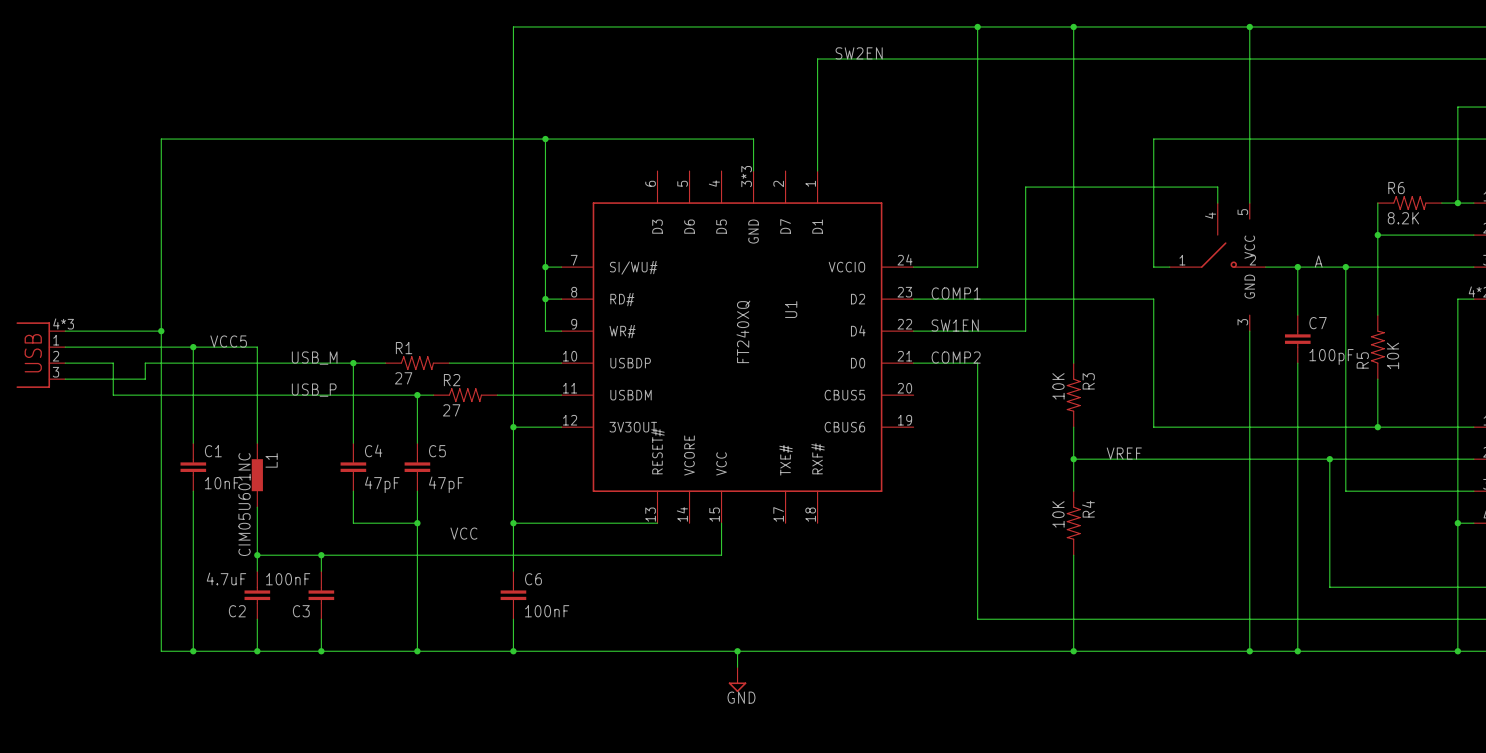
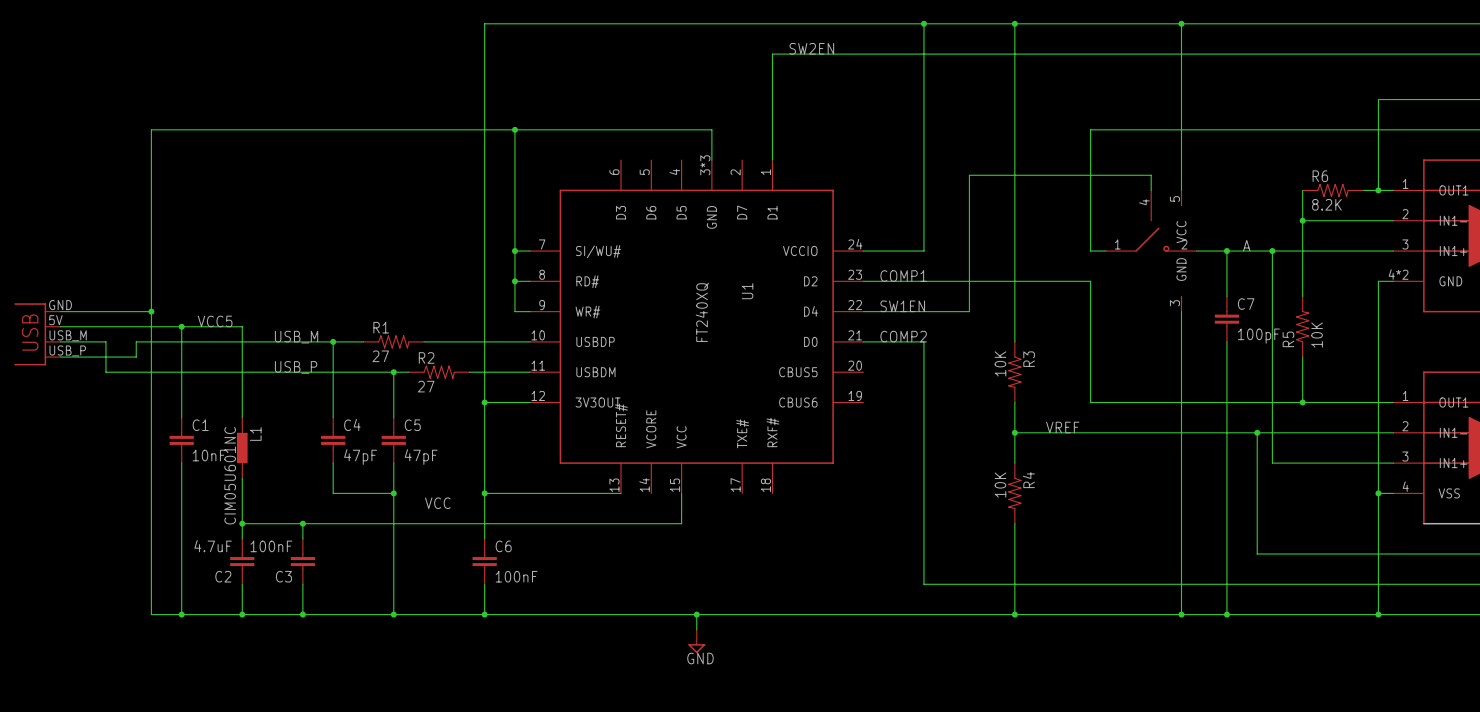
part pin number: 4*3 (63, 323) -> GND (60, 305)
part pin number: 1 (56, 340) -> 5V (55, 320)
part pin number: 2 (55, 356) -> USB_M (68, 335)
part pin number: 3 (55, 372) -> USB_P (67, 350)

